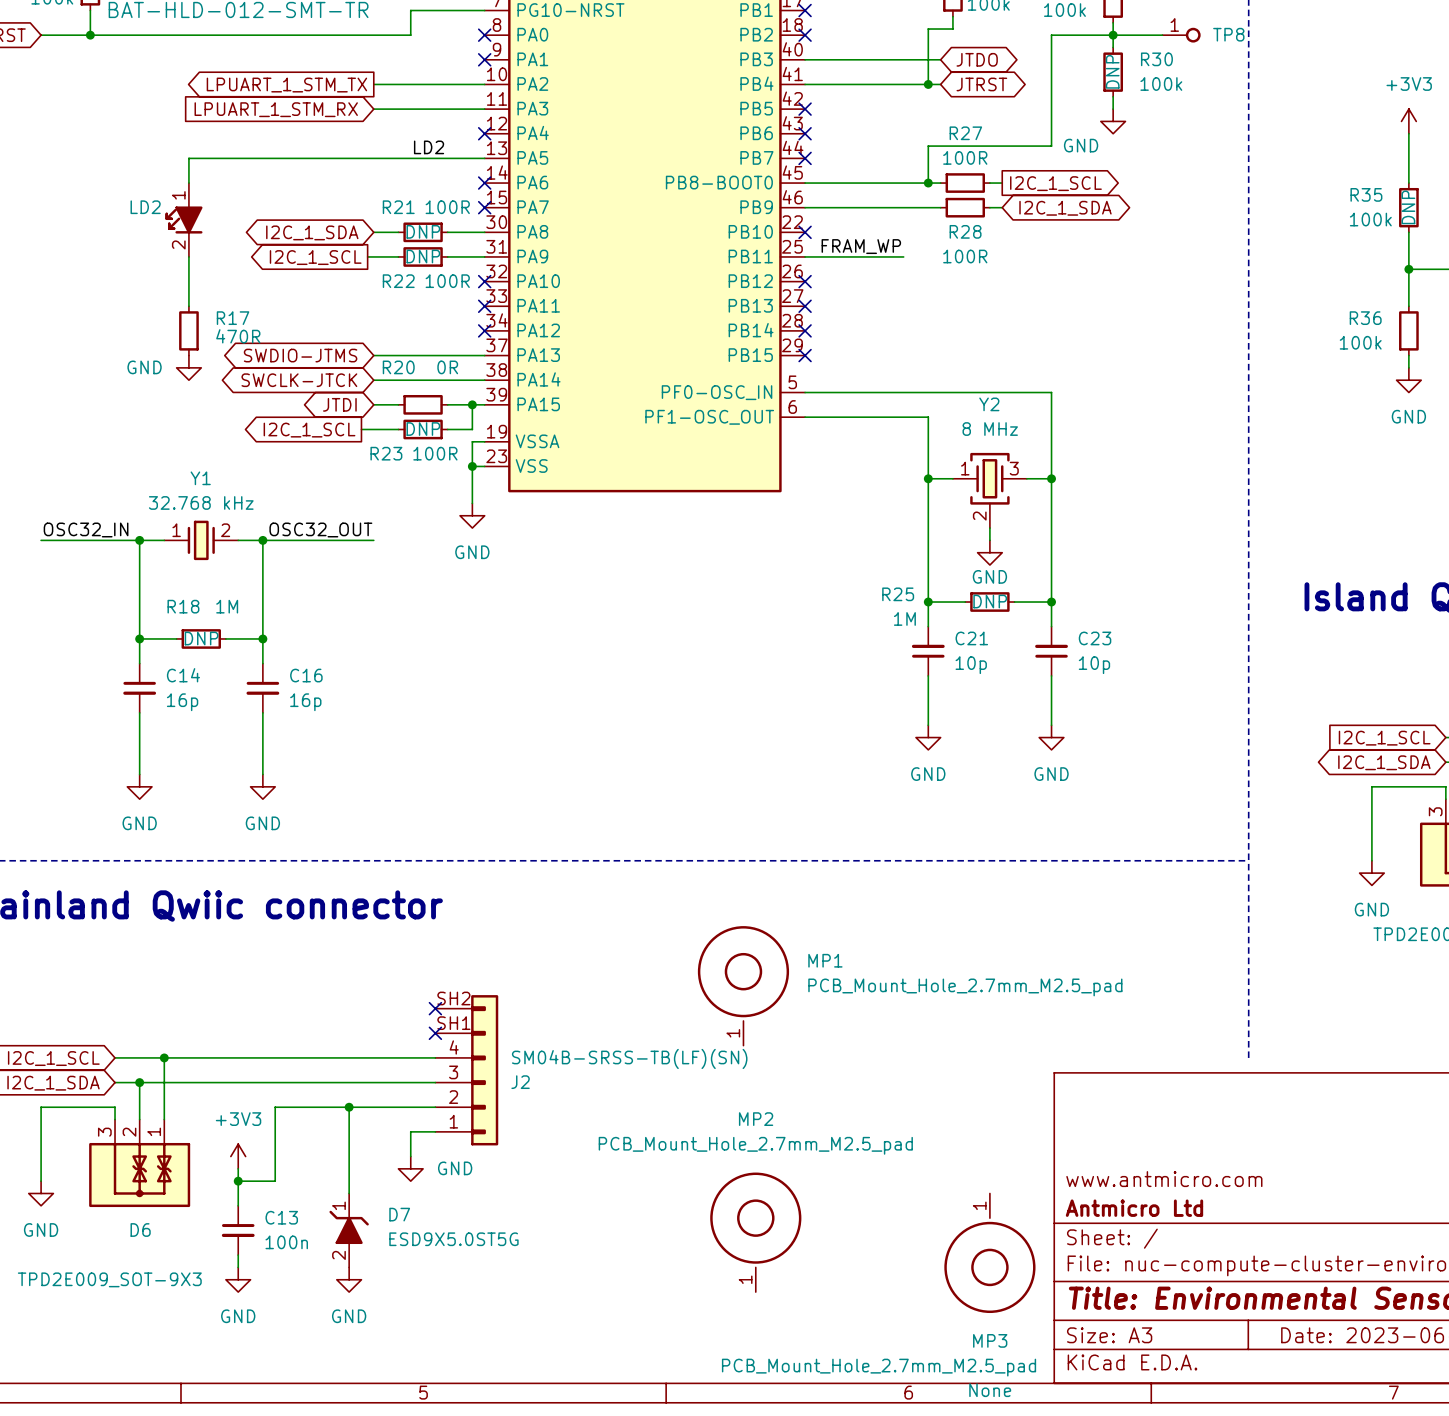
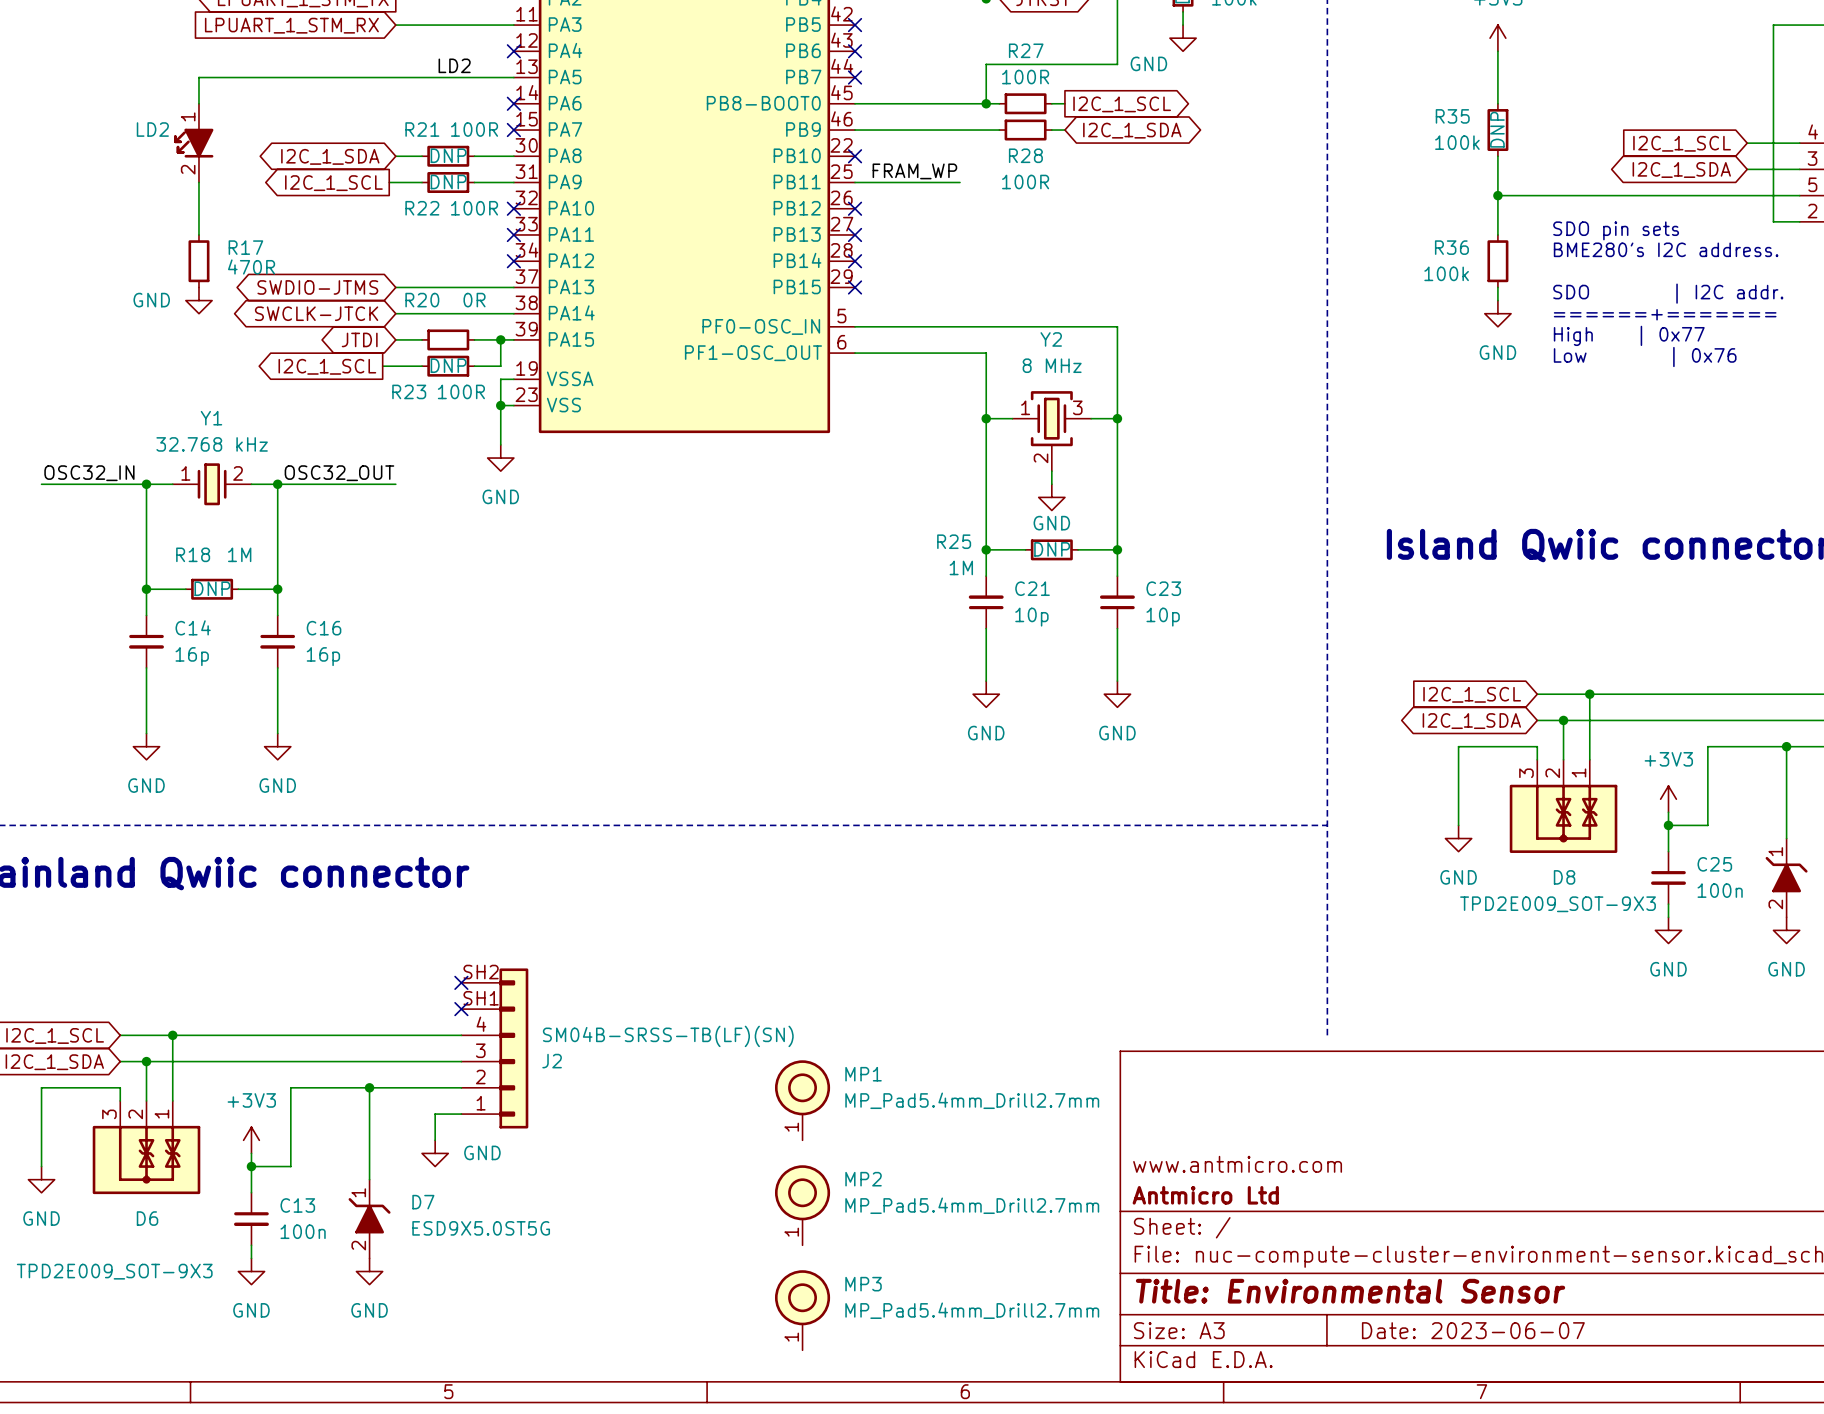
MP1 symbol: [697, 926, 790, 1046] -> [774, 1060, 831, 1141]
MP1 name position: MP1 (825, 960) -> MP1 (863, 1074)
MP1 value: PCB_Mount_Hole_2.7mm_M2.5_pad (965, 987) -> MP_Pad5.4mm_Drill2.7mm (972, 1100)
MP2 name position: MP2 (756, 1119) -> MP2 (863, 1179)
MP2 value: PCB_Mount_Hole_2.7mm_M2.5_pad (755, 1145) -> MP_Pad5.4mm_Drill2.7mm (972, 1205)
MP2 symbol: [710, 1172, 802, 1293] -> [774, 1165, 831, 1246]
MP3 symbol: [944, 1193, 1036, 1314] -> [774, 1270, 831, 1351]
MP3 name position: MP3 (990, 1340) -> MP3 (863, 1284)
MP3 value: PCB_Mount_Hole_2.7mm_M2.5_pad (879, 1367) -> MP_Pad5.4mm_Drill2.7mm (972, 1310)
MP3 text: None (990, 1390) -> none

